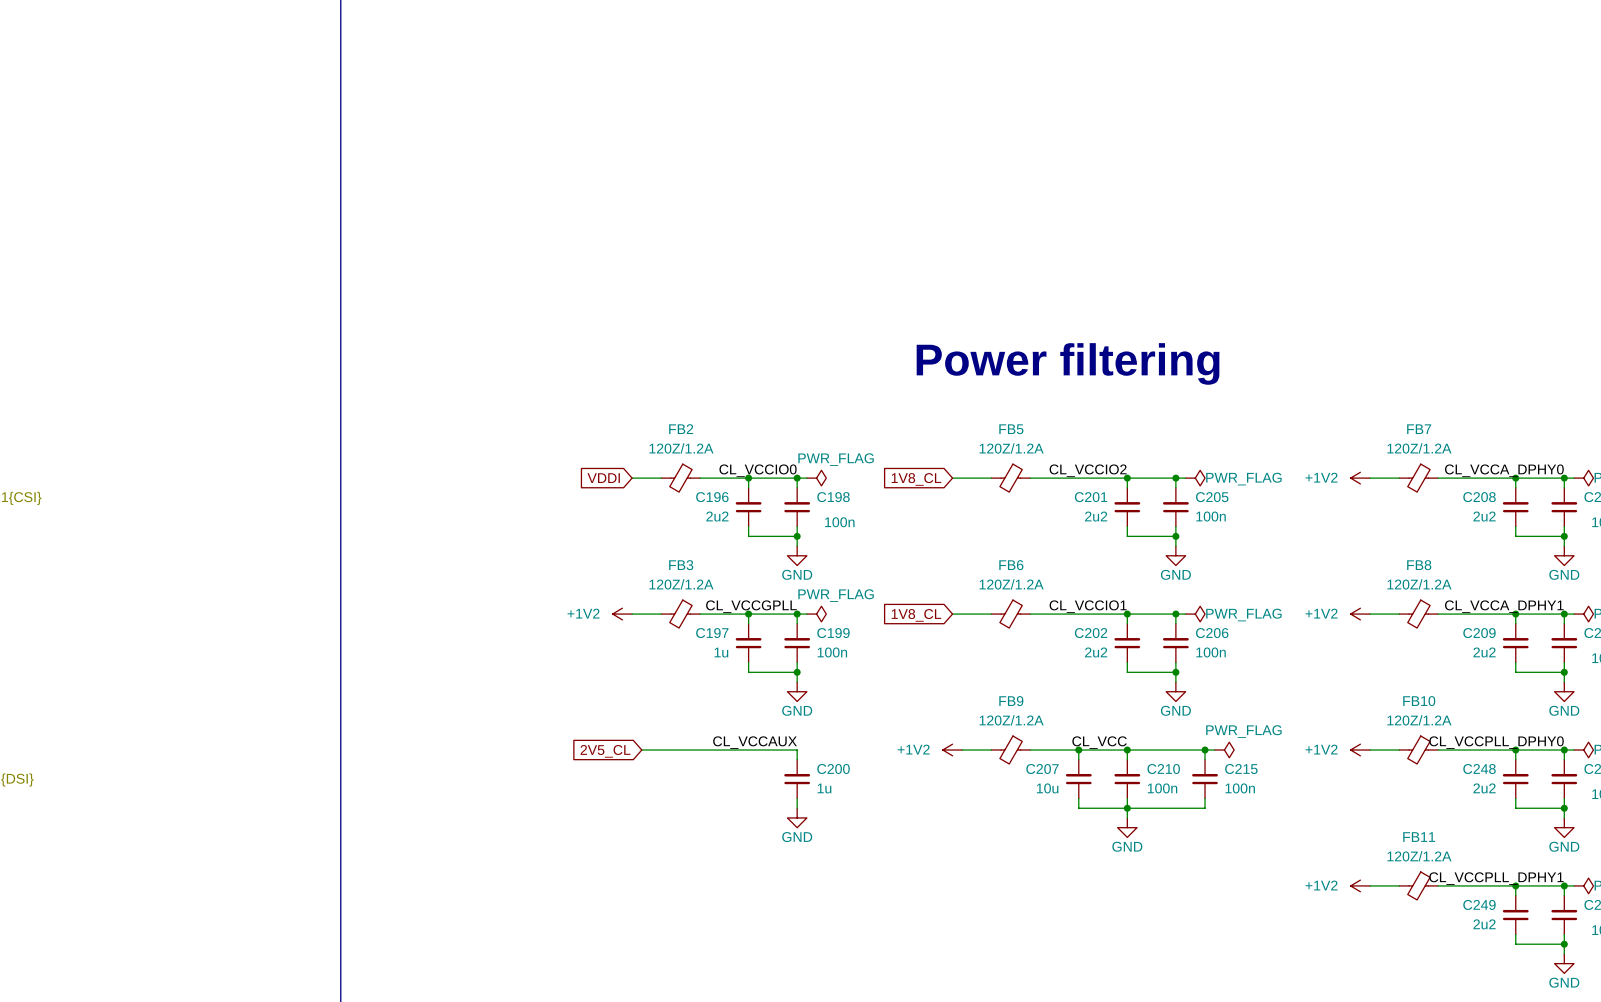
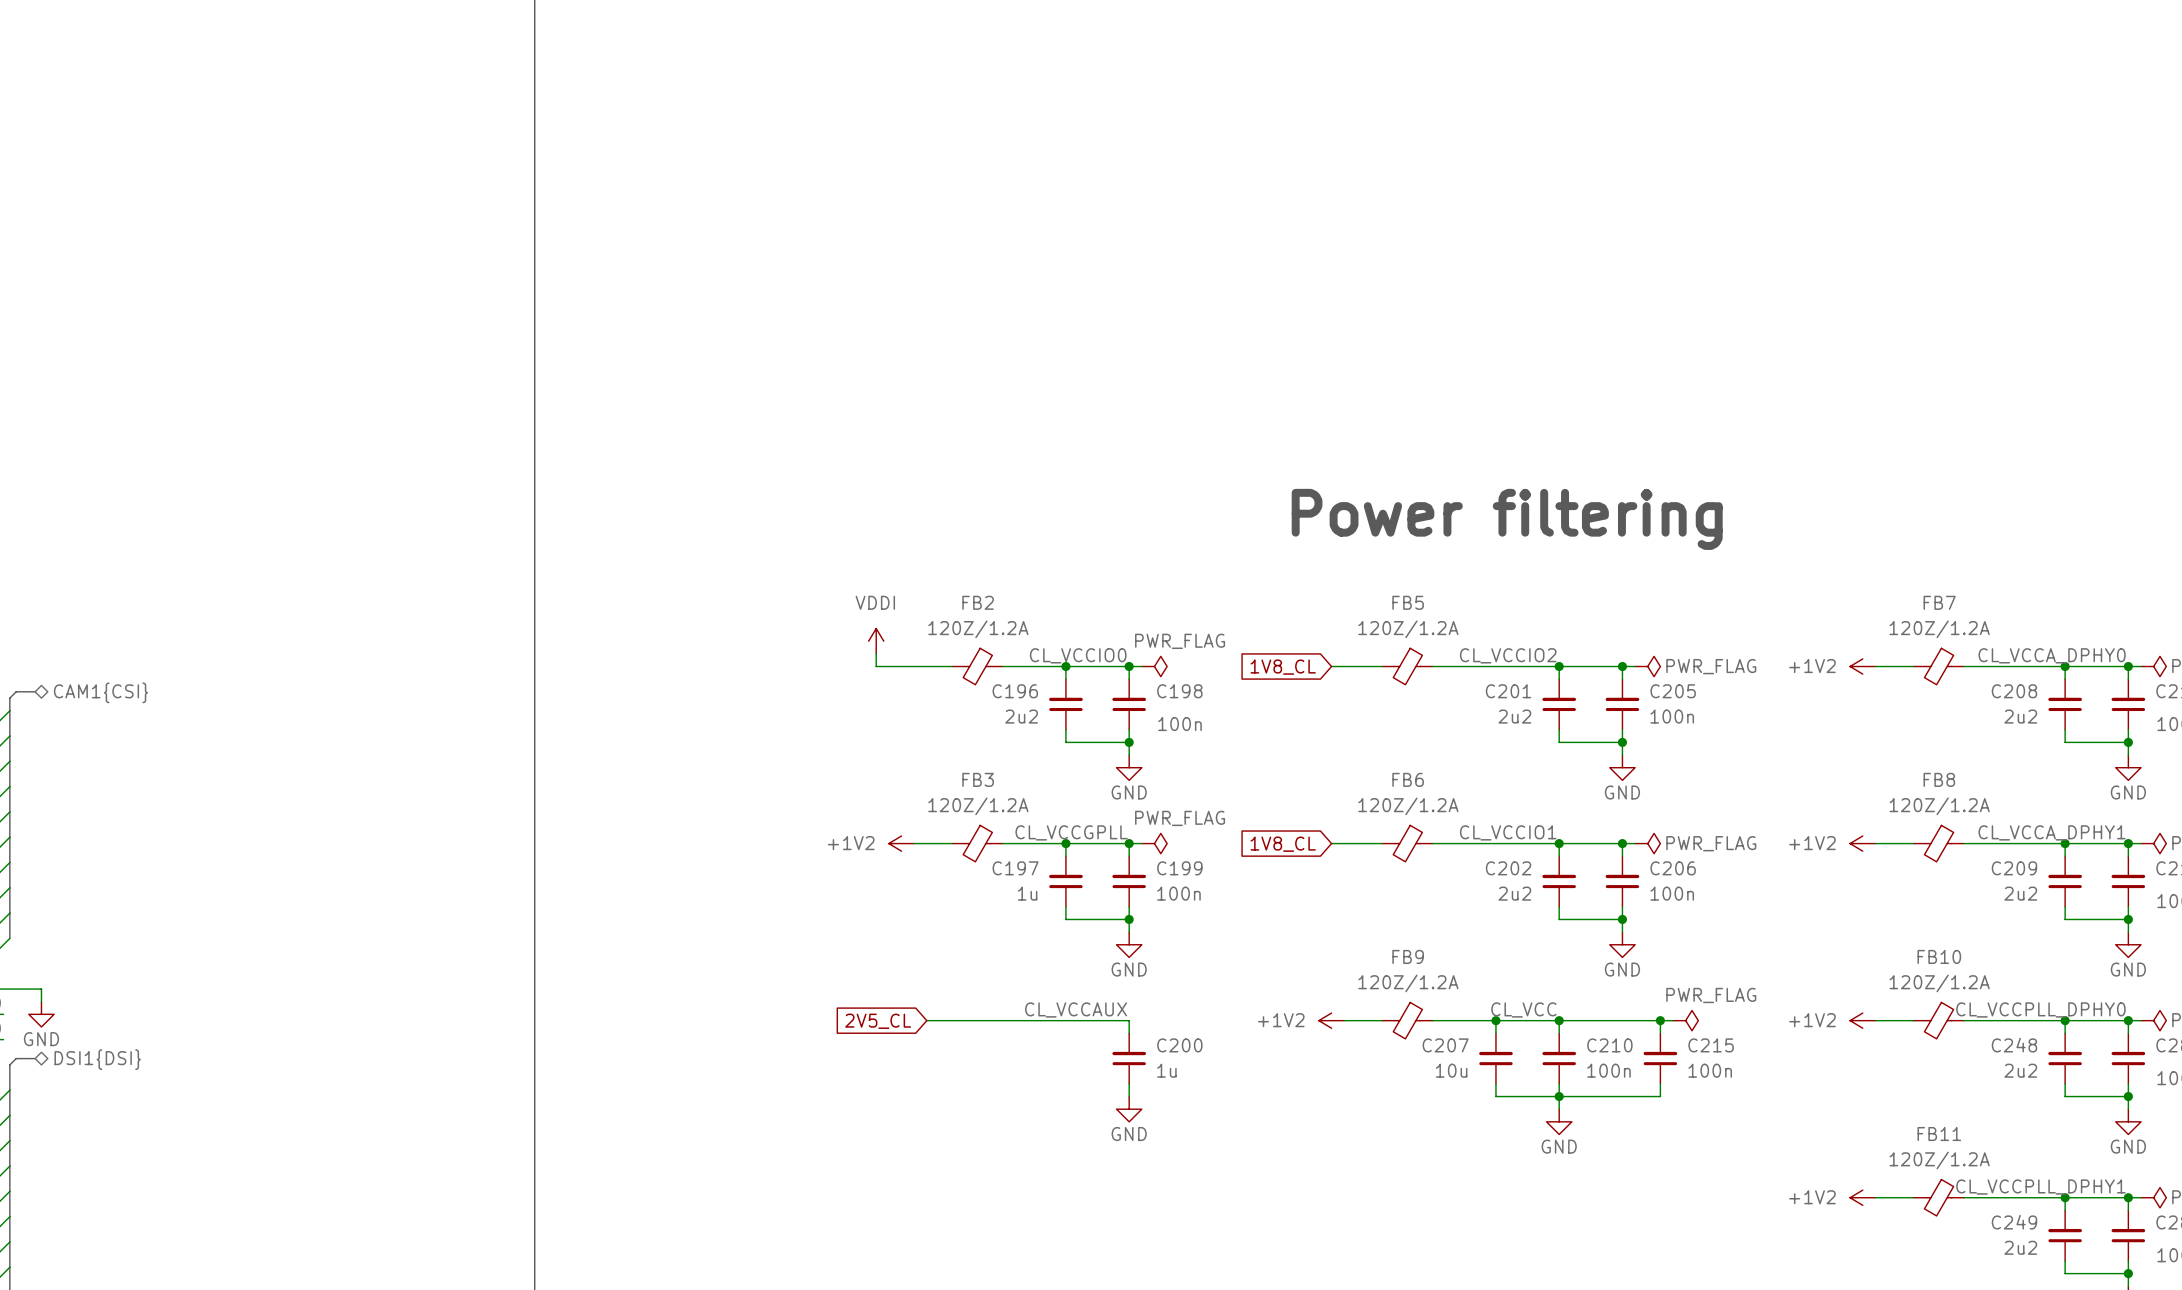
power symbol: none -> VDDI (876, 641)
wire: none -> (876, 653) (876, 666) (914, 666)
global label: VDDI (603, 478) -> none

